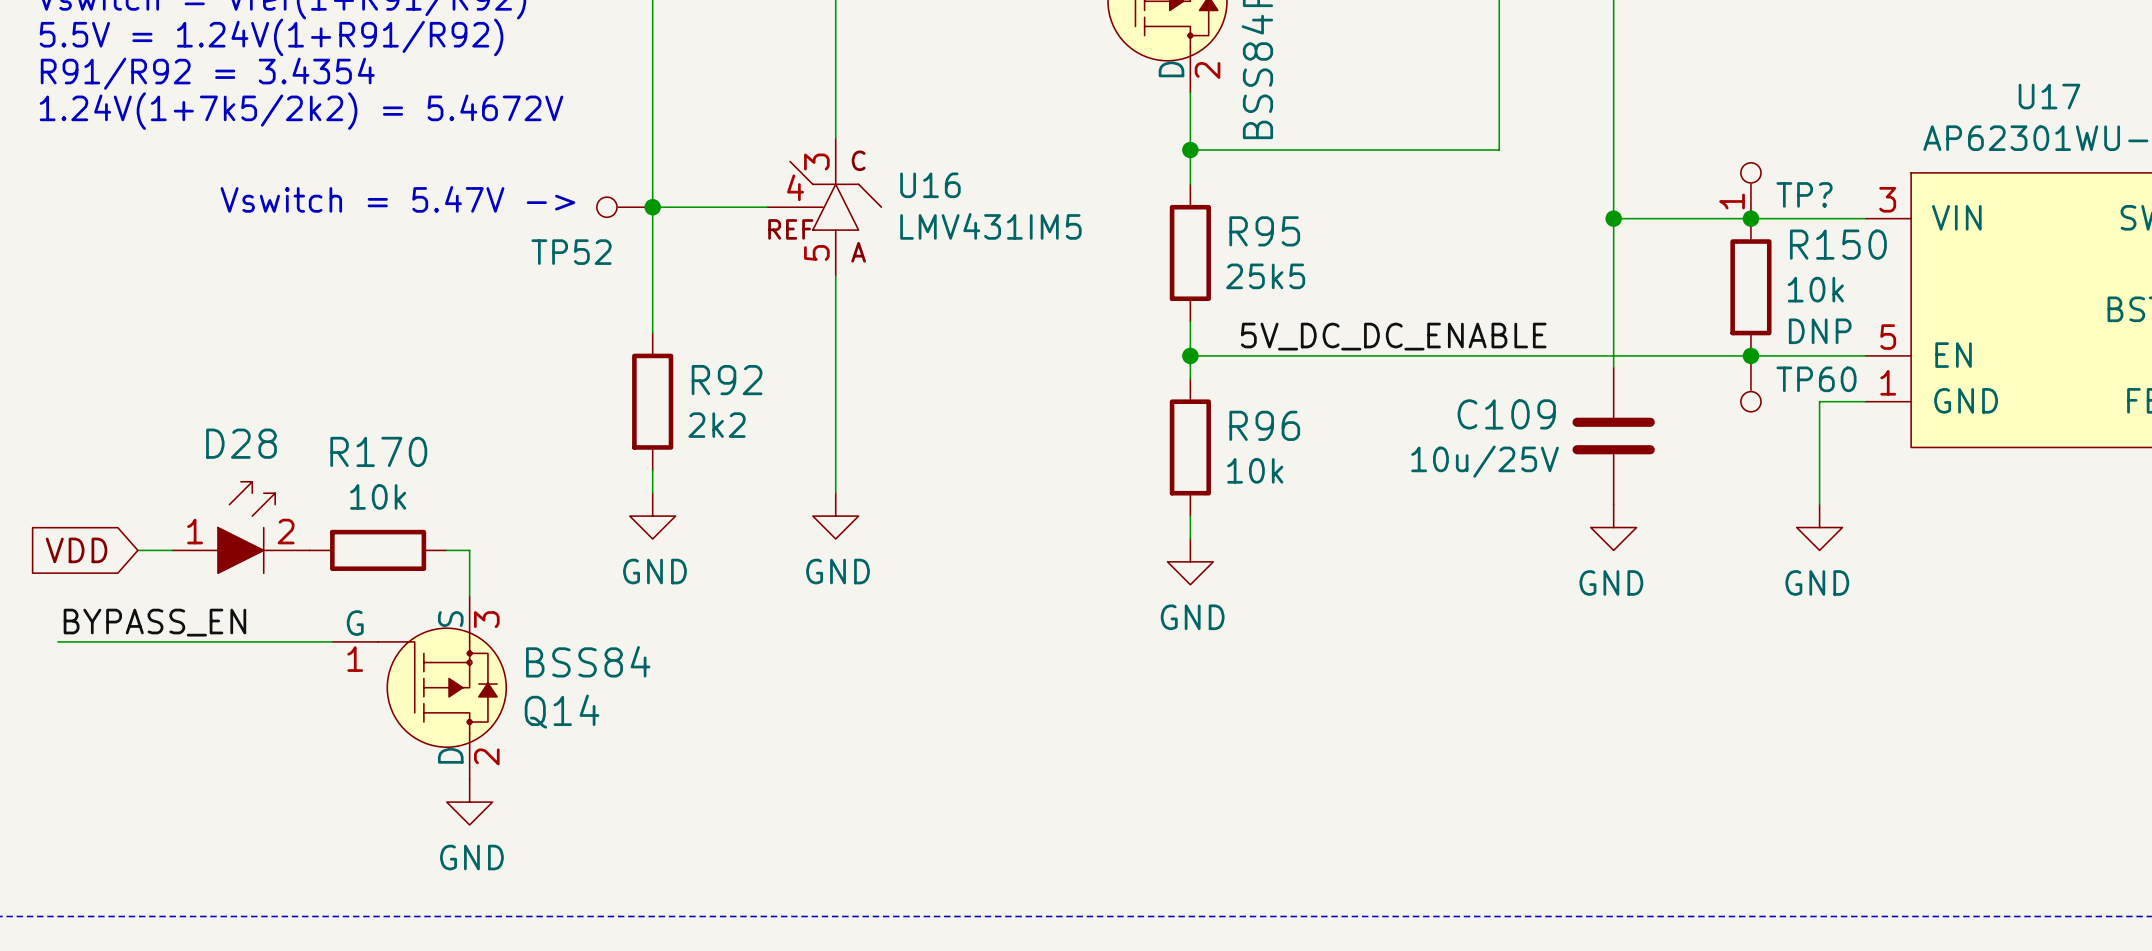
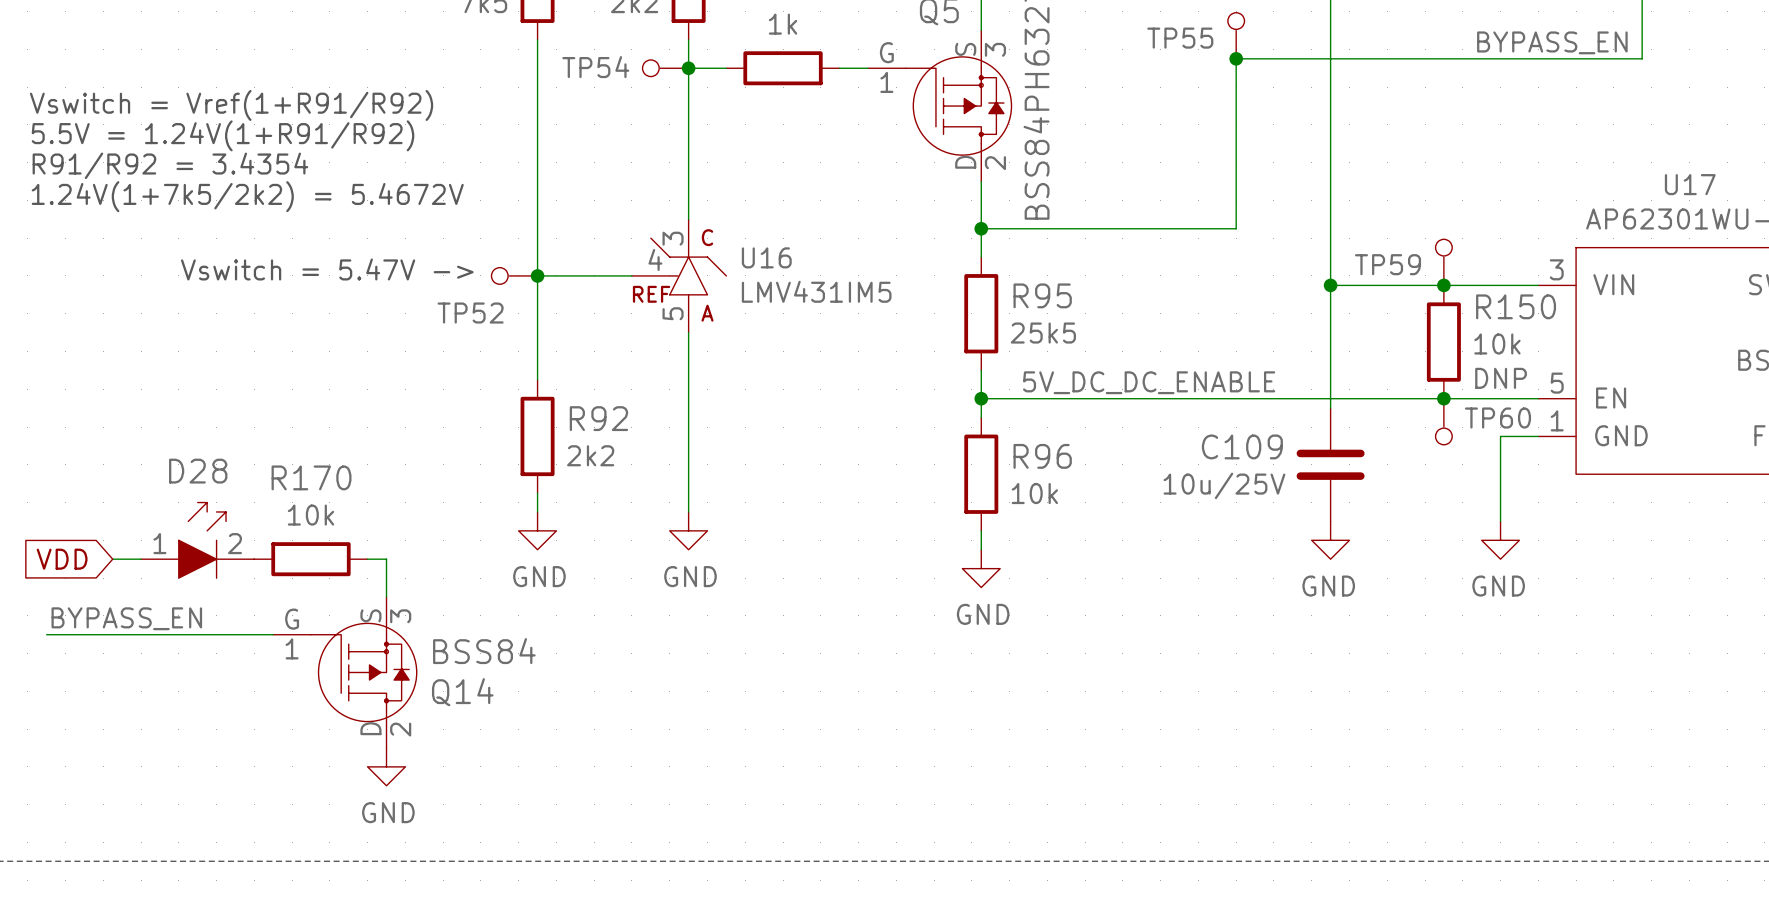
TP? name: TP? (1804, 194) -> TP59 (1388, 264)
TP? pin number: 1 (1732, 201) -> none

